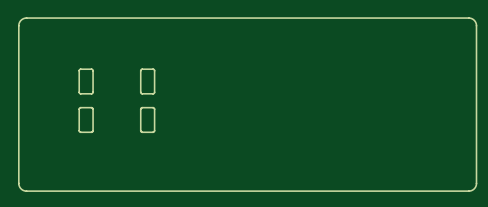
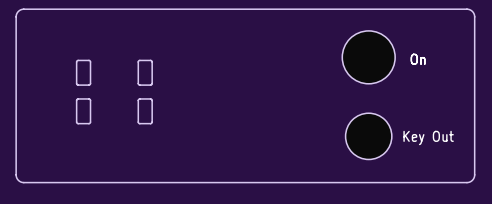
hole: none -> (368, 57)
text: none -> On (418, 59)
hole: none -> (368, 136)
text: none -> Key Out (428, 137)

